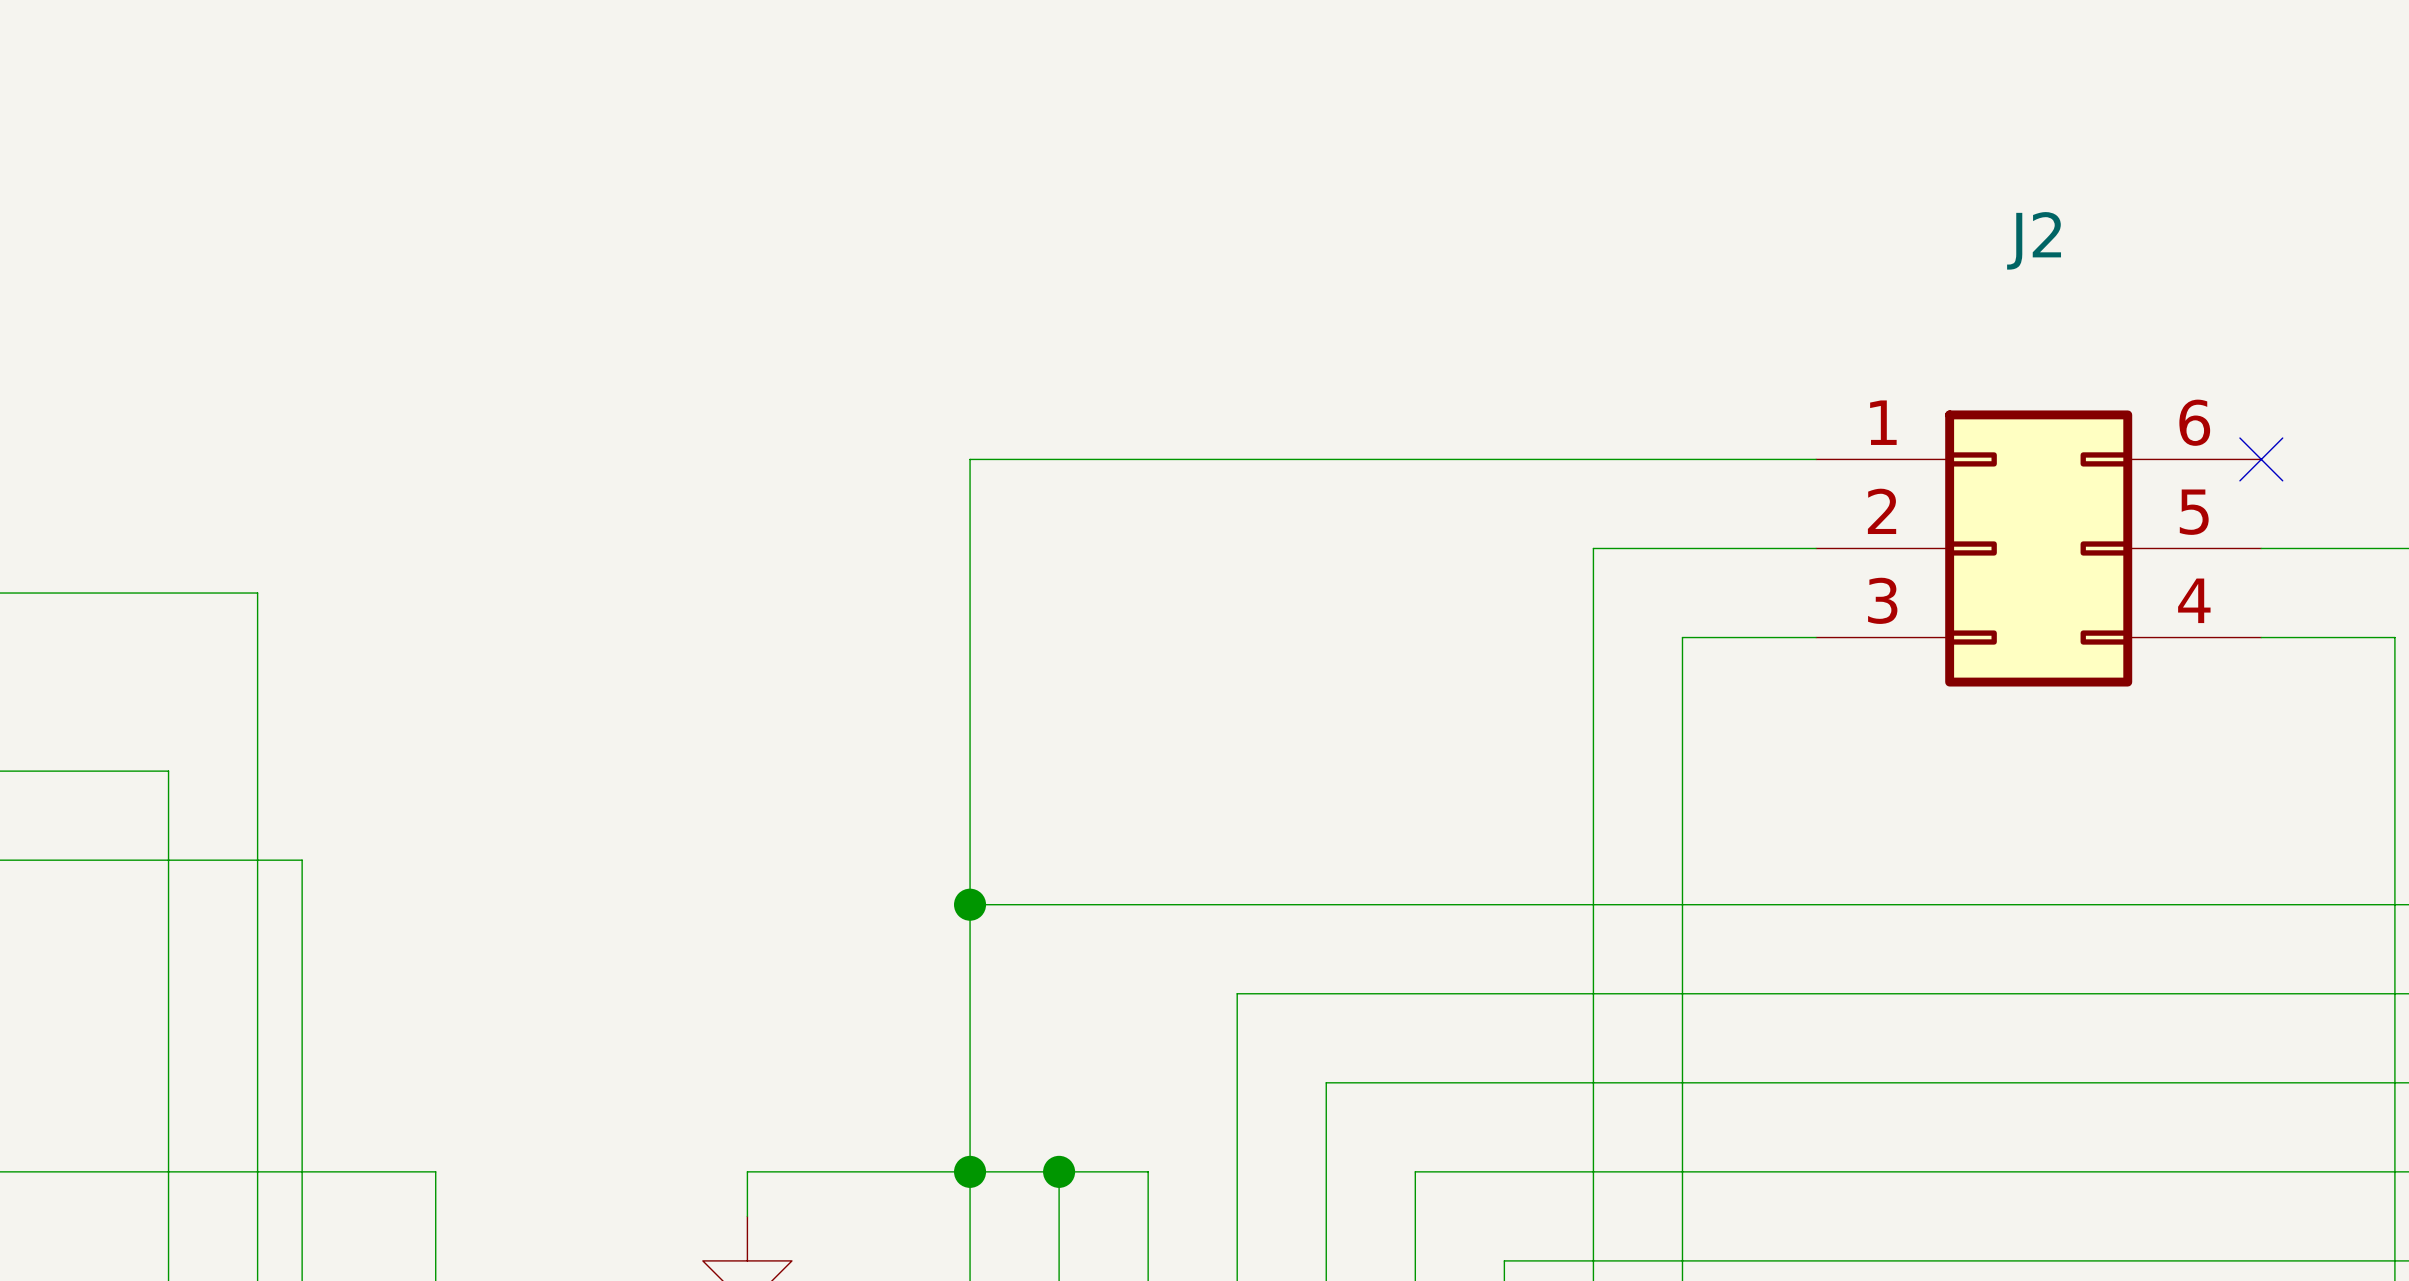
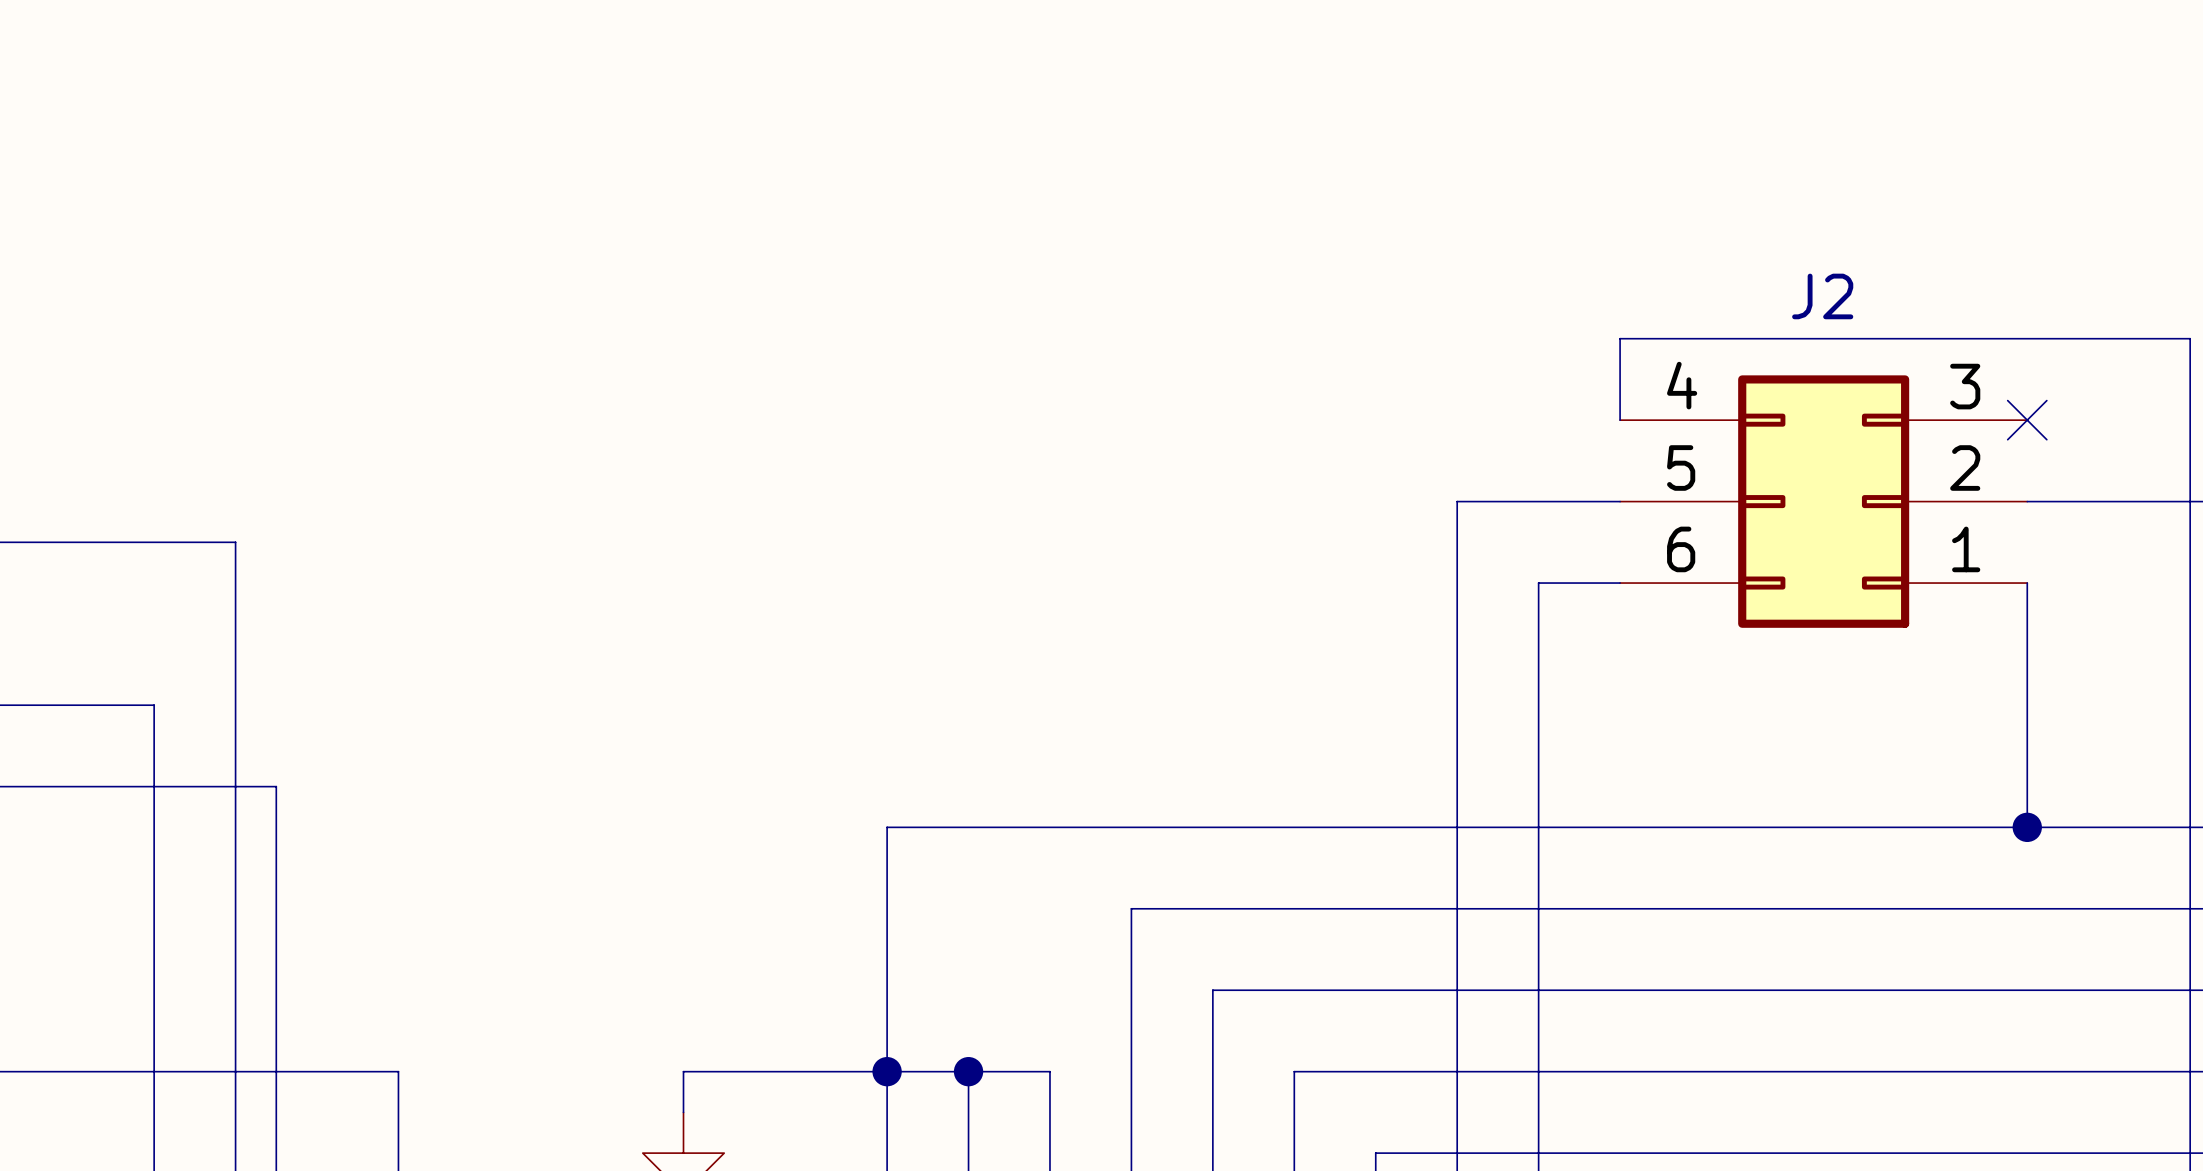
J2 name position: J2 (2034, 240) -> J2 (1822, 296)
wire: (1816, 459) (970, 459) (970, 904) -> none
no-connect mark position: (2261, 459) -> (2027, 420)
J2 rotation: 0° (2038, 548) -> 180° (1823, 501)
wire: none -> (2027, 583) (2027, 827)
wire: (2261, 637) (2394, 637) -> (1620, 420) (1620, 338) (2190, 338) (2190, 583)
junction: (970, 904) -> none
junction: none -> (2027, 827)

